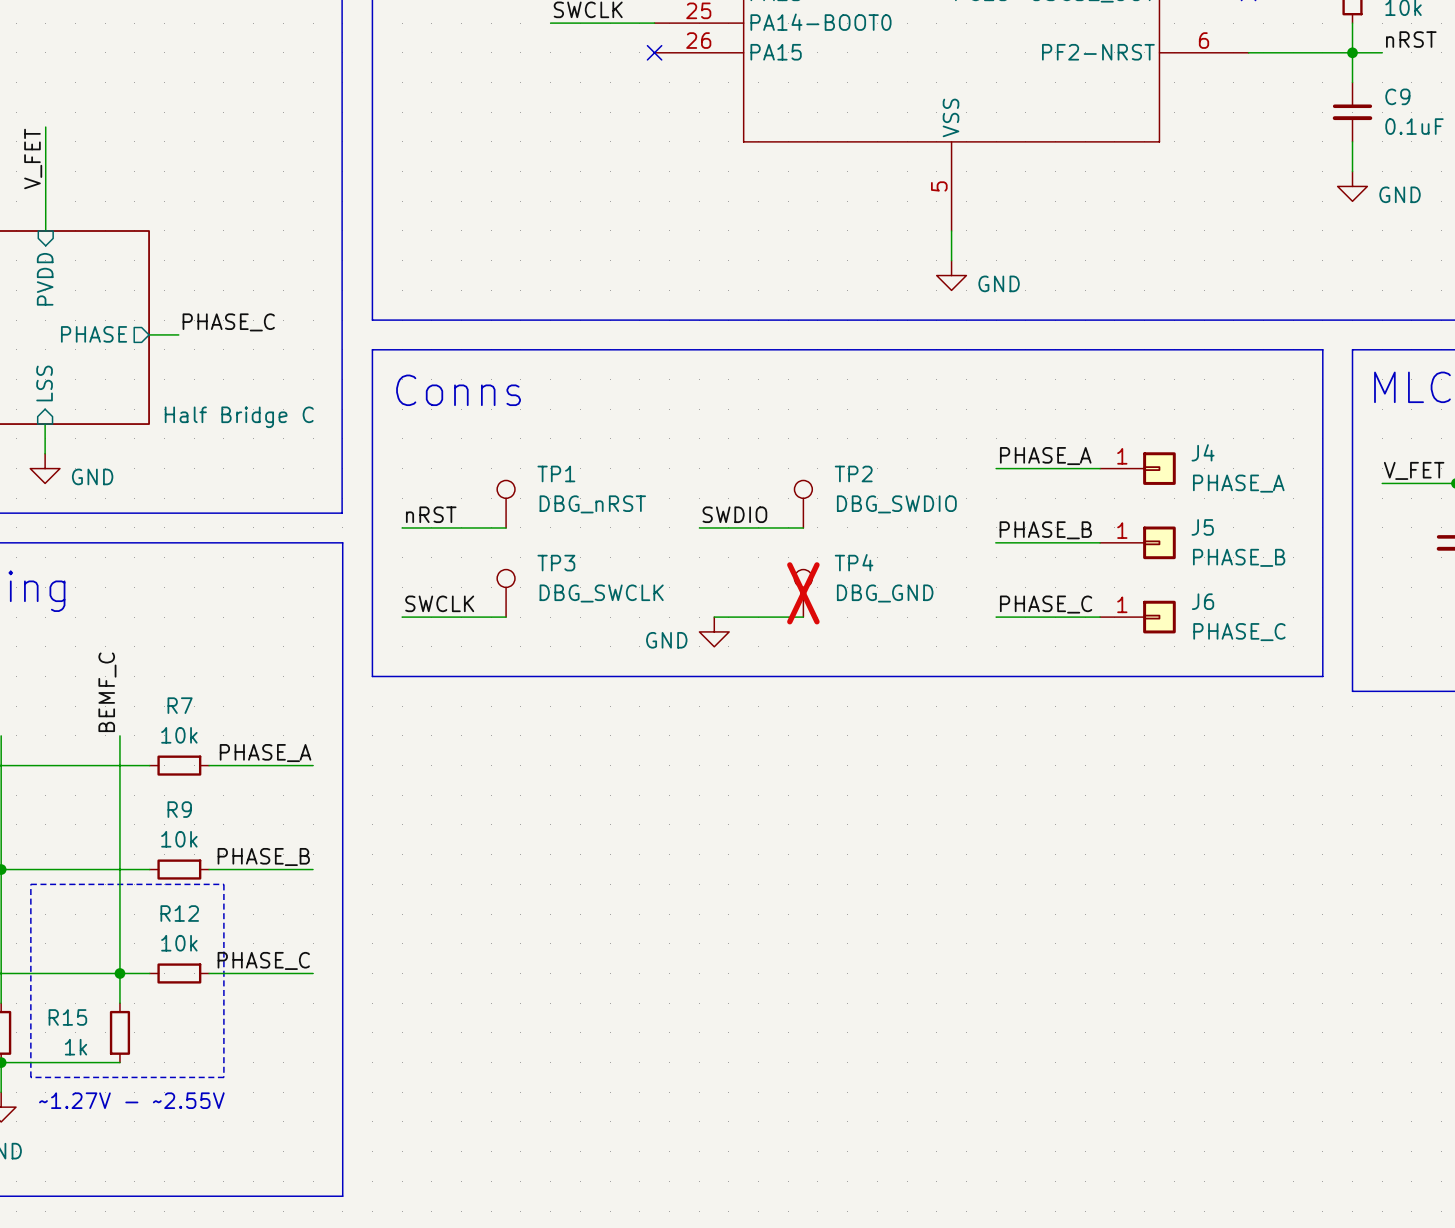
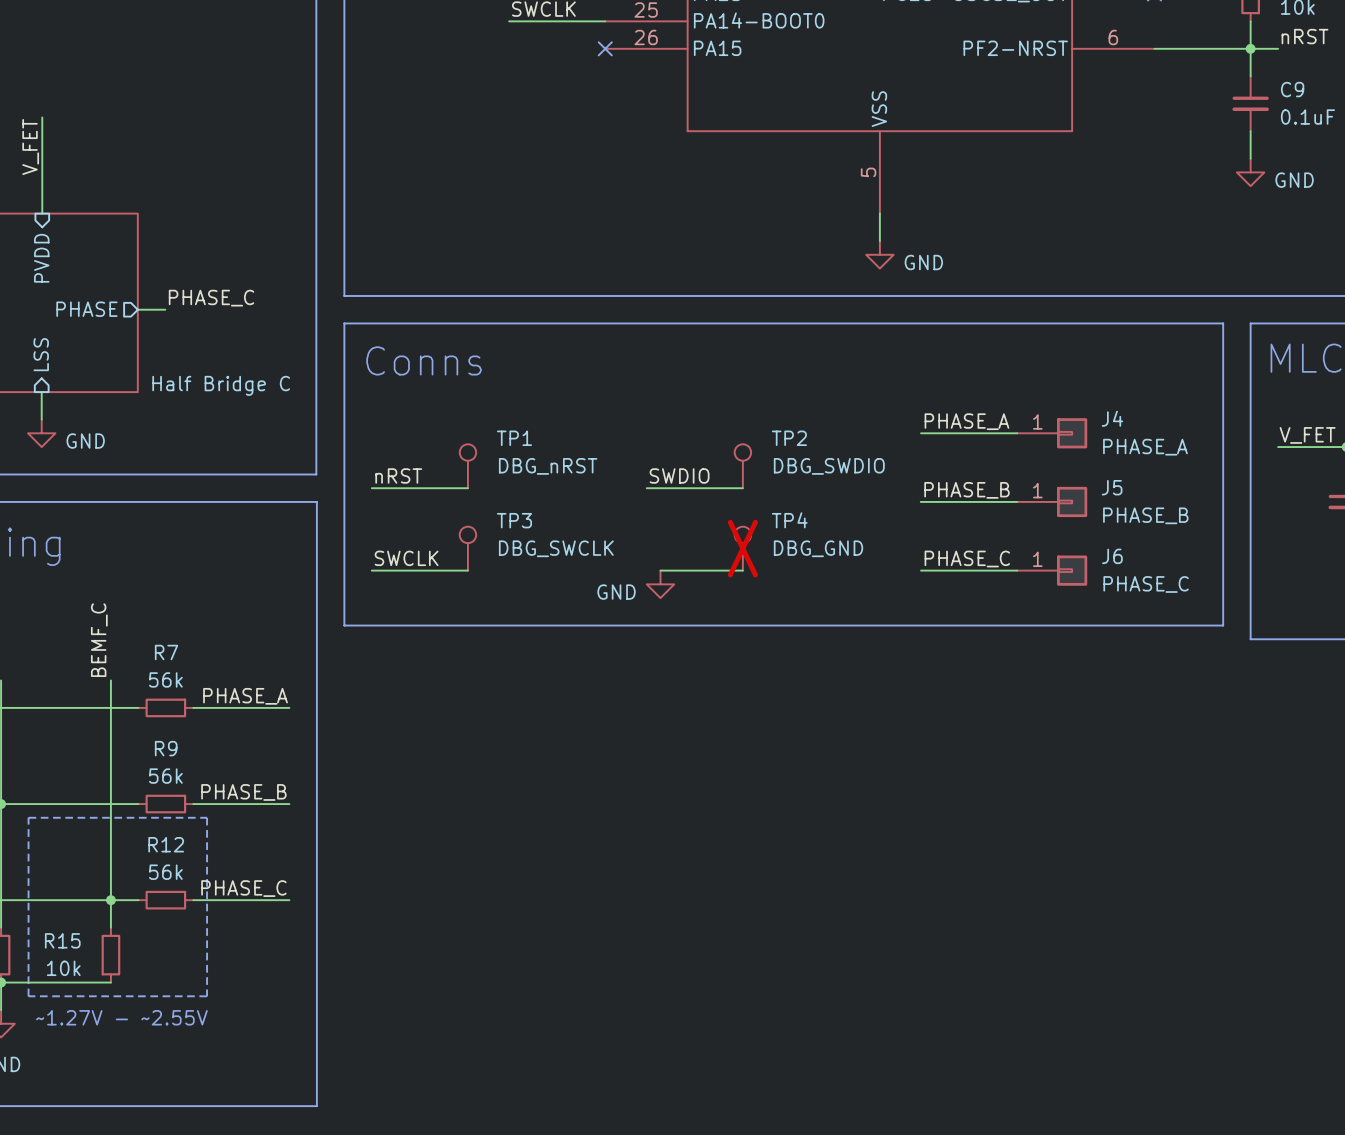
R7 value: 10k (179, 735) -> 56k (165, 679)
R9 value: 10k (179, 839) -> 56k (165, 776)
R12 value: 10k (179, 943) -> 56k (165, 872)
R15 value: 1k (76, 1047) -> 10k (63, 968)

